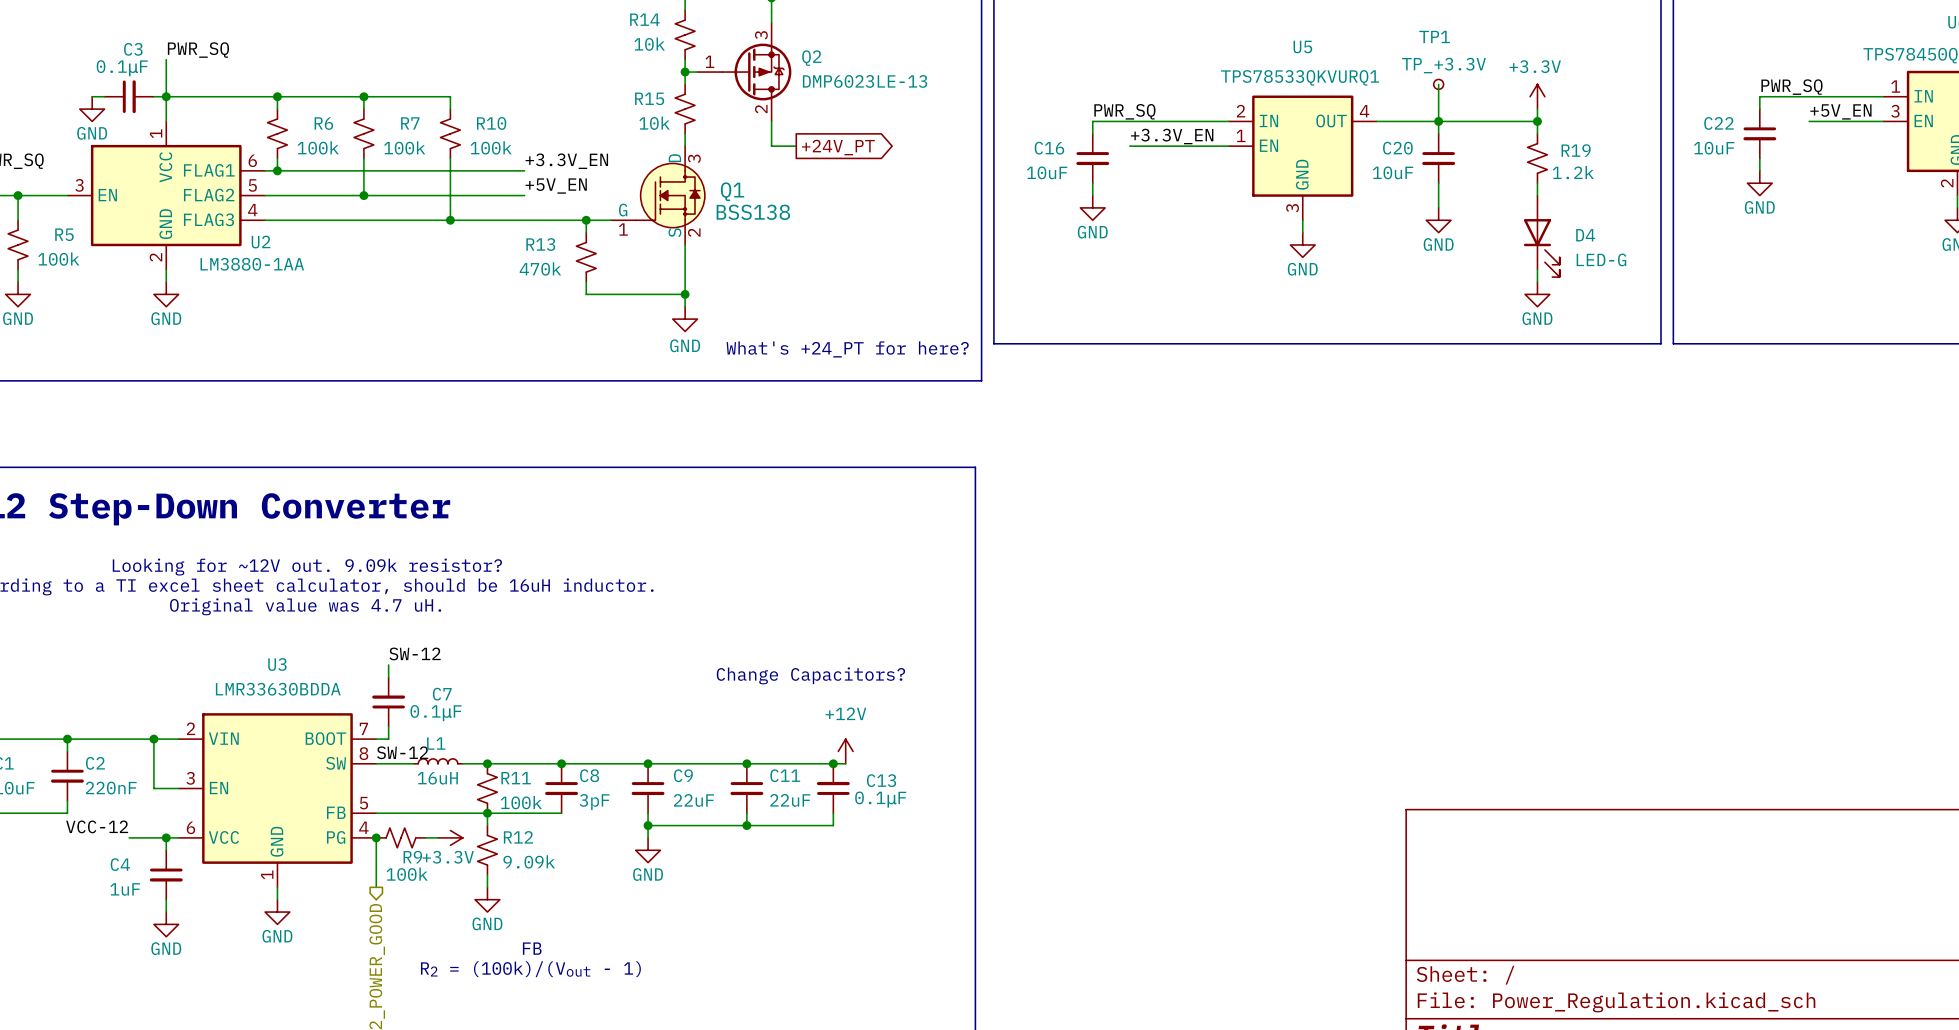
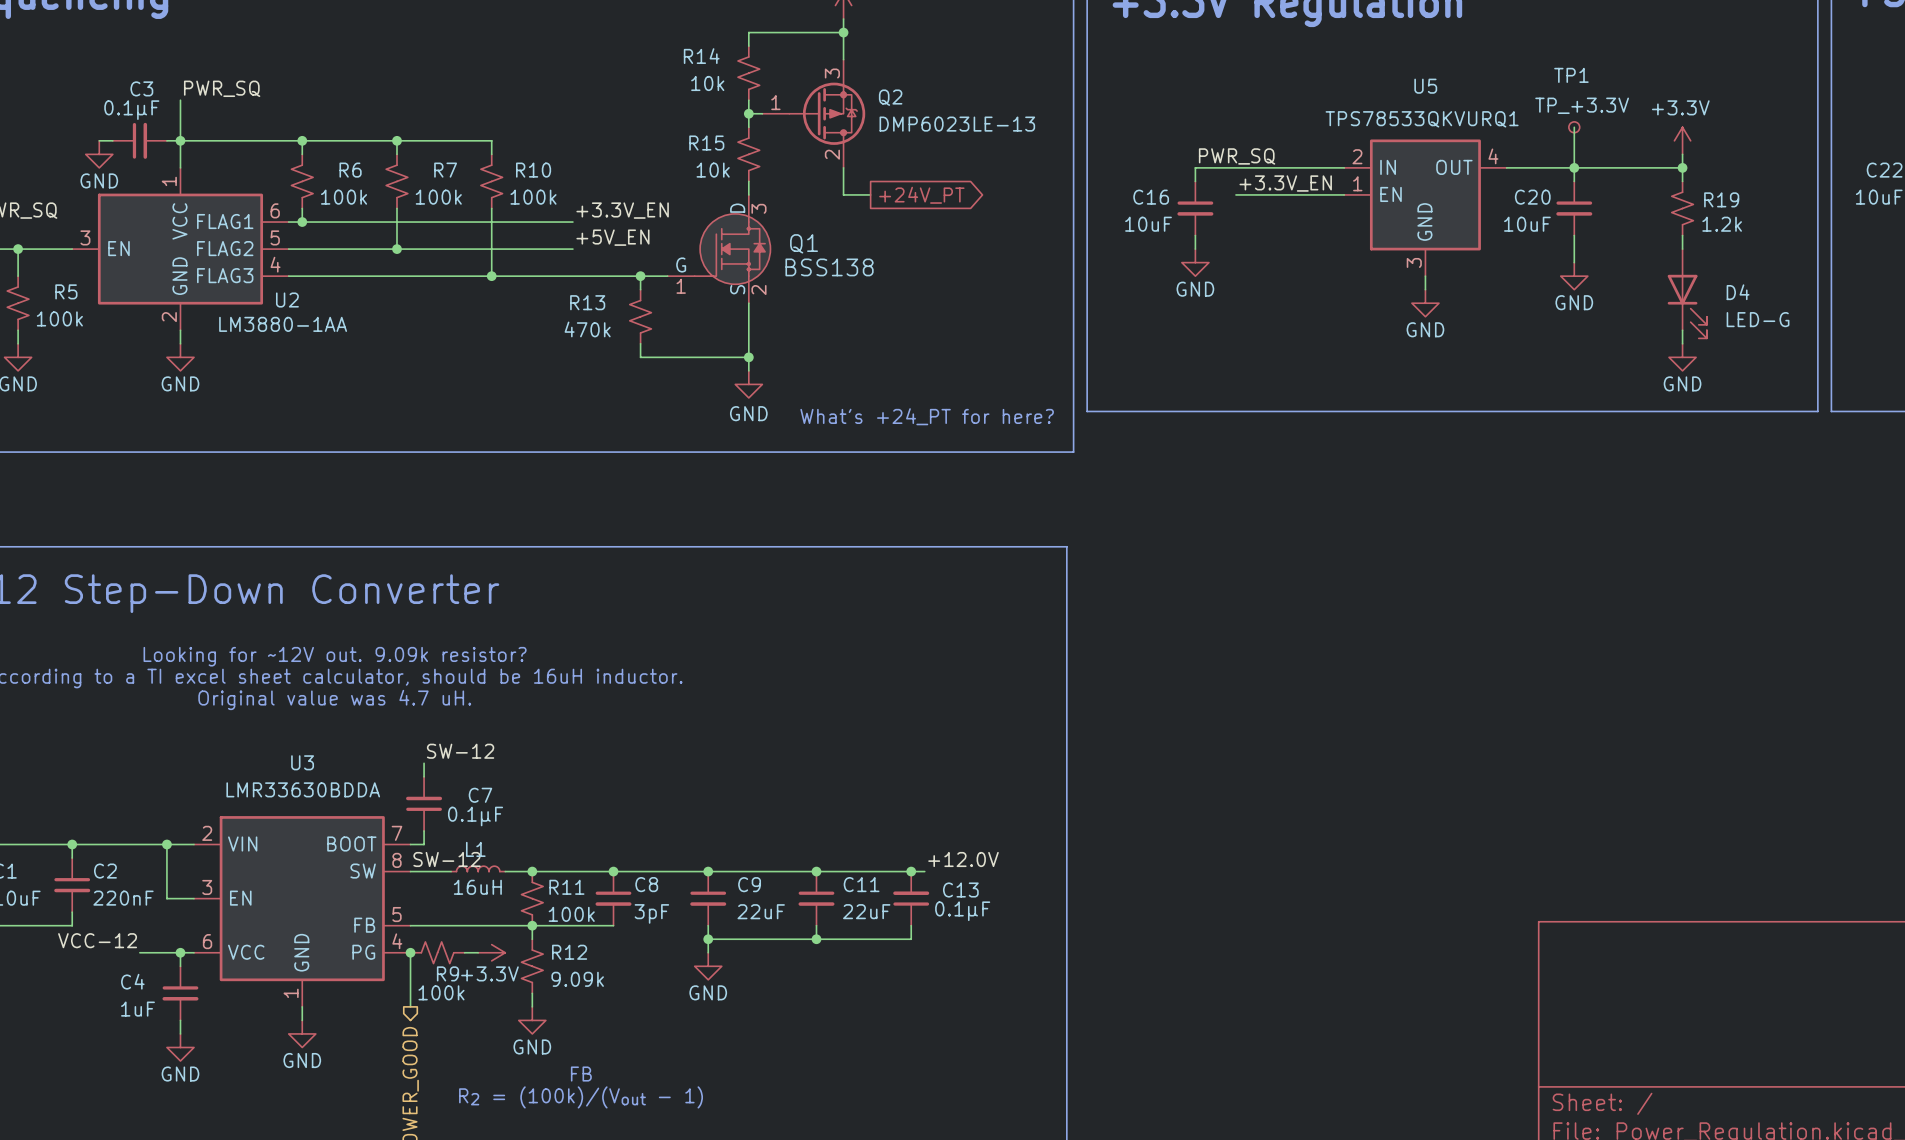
text: Change Capacitors? (810, 675) -> none
power symbol: +12V (845, 751) -> none
label: none -> +12.0V (963, 859)

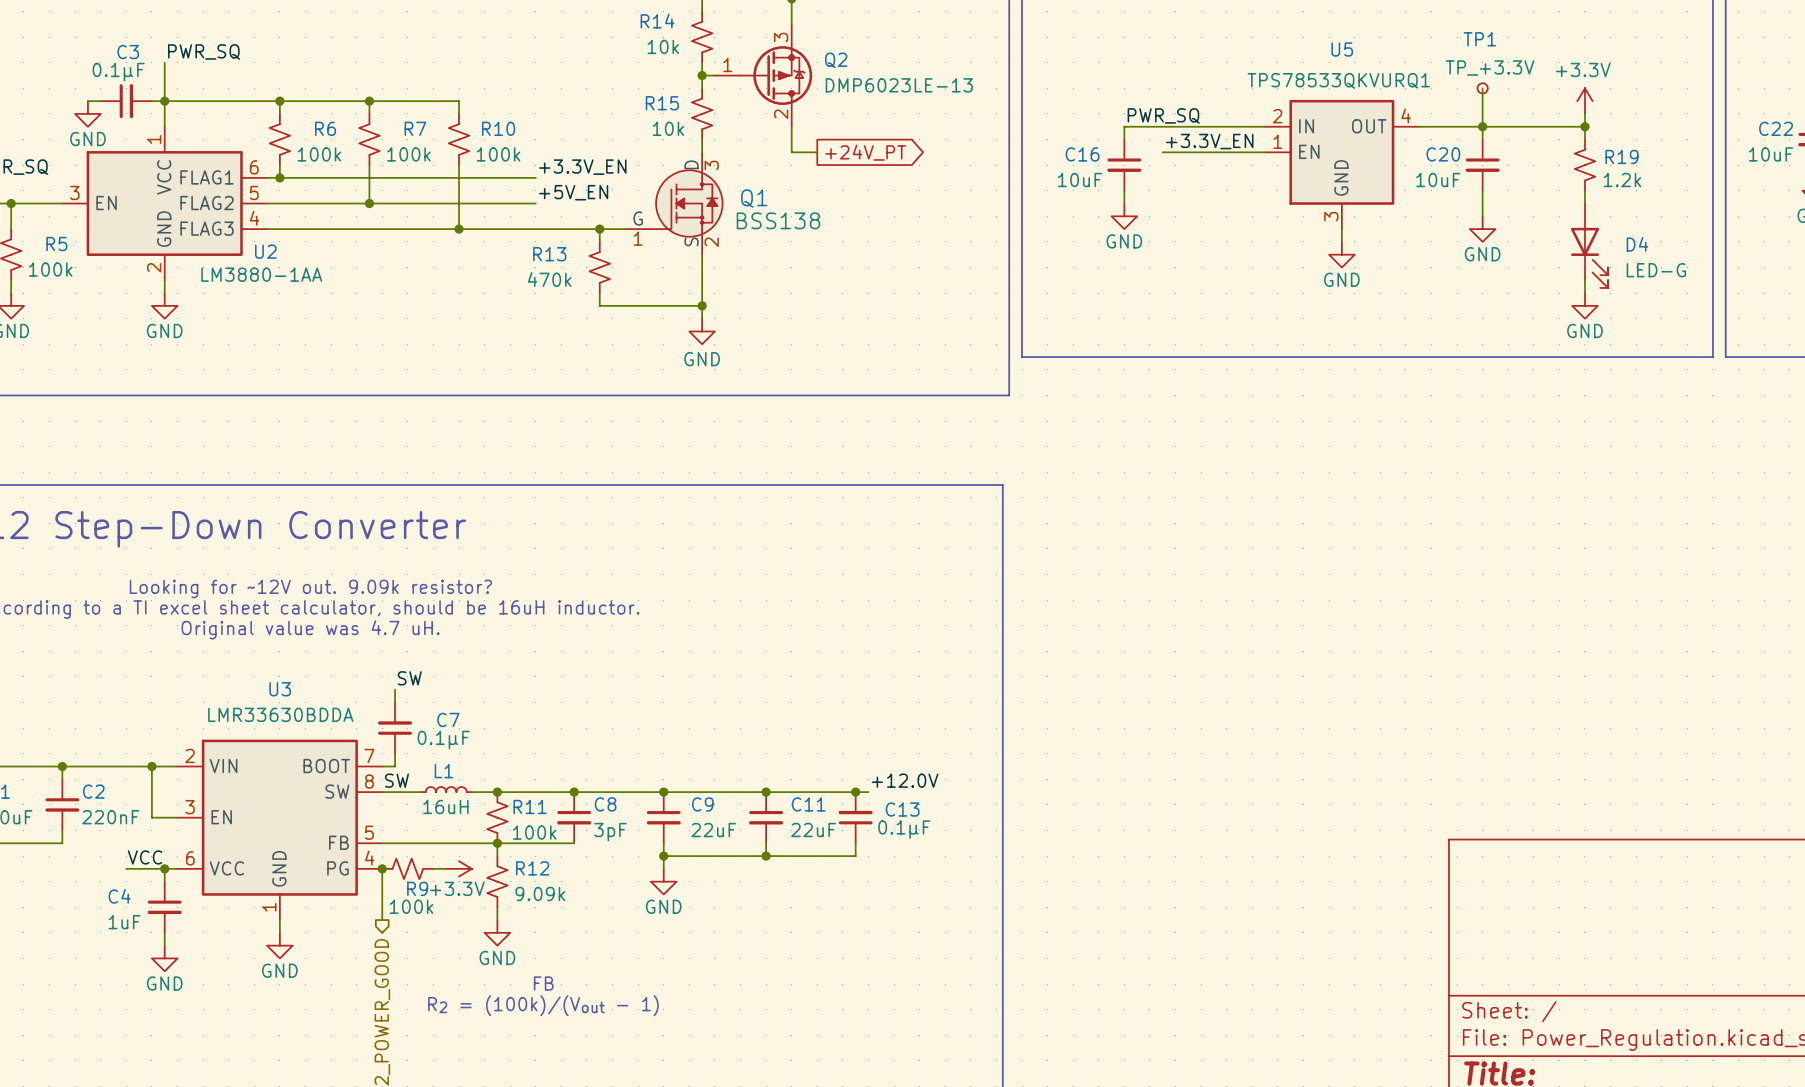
text: What's +24_PT for here? (927, 416) -> none
label: SW-12 (460, 751) -> SW (409, 678)
label: SW-12 (447, 859) -> SW (396, 780)
label: VCC-12 (97, 940) -> VCC (145, 857)

